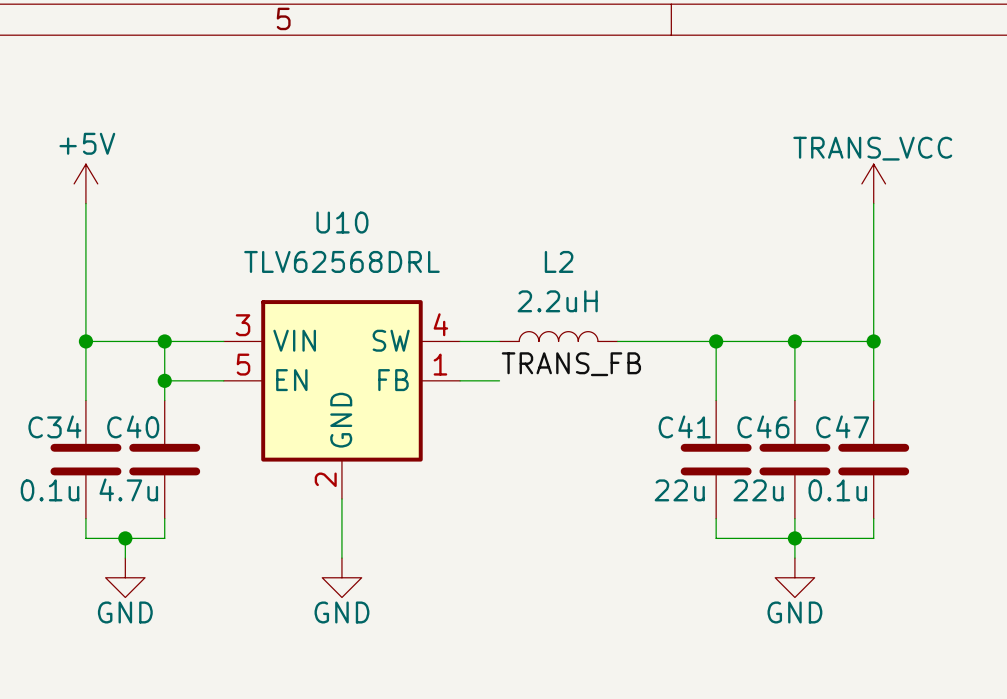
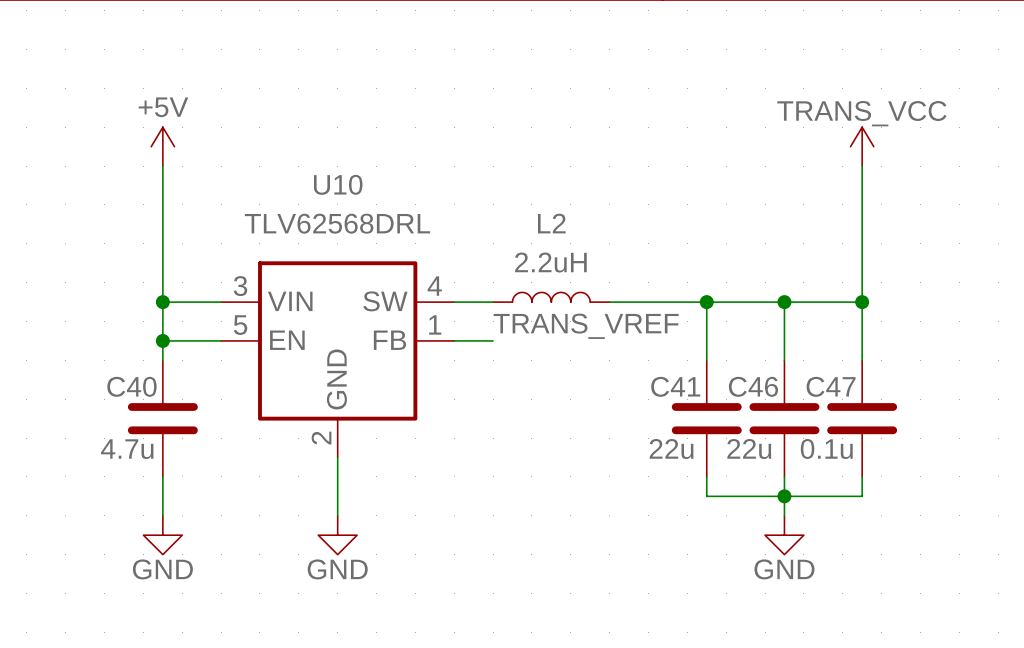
power symbol position: +5V (85, 183) -> +5V (162, 146)
wire: (85, 203) (85, 400) -> none
wire: (85, 341) (164, 341) -> (162, 166) (162, 302)
junction: (85, 341) -> none
label: TRANS_FB (571, 364) -> TRANS_VREF (586, 326)
C34: 0.1u (85, 459) -> none
wire: (85, 518) (85, 538) (164, 538) -> (162, 515) (162, 496)
wire: (125, 538) (125, 558) -> none
junction: (125, 538) -> none
power symbol position: GND (125, 577) -> GND (162, 535)

